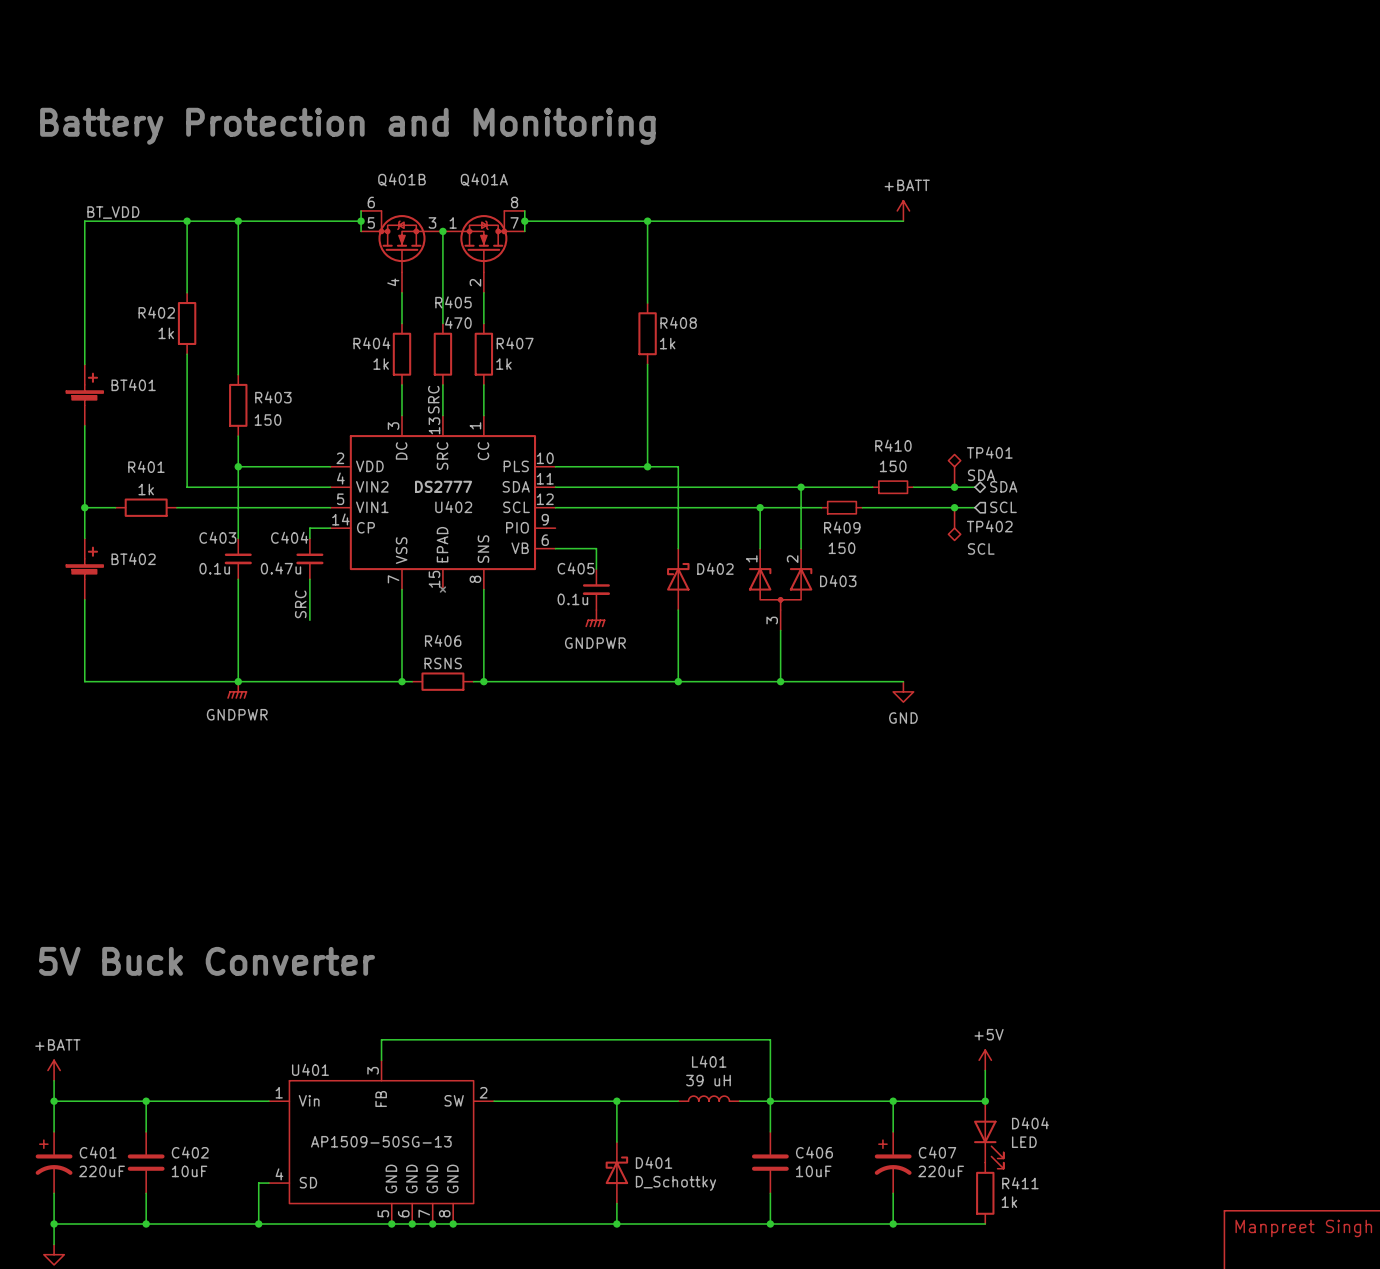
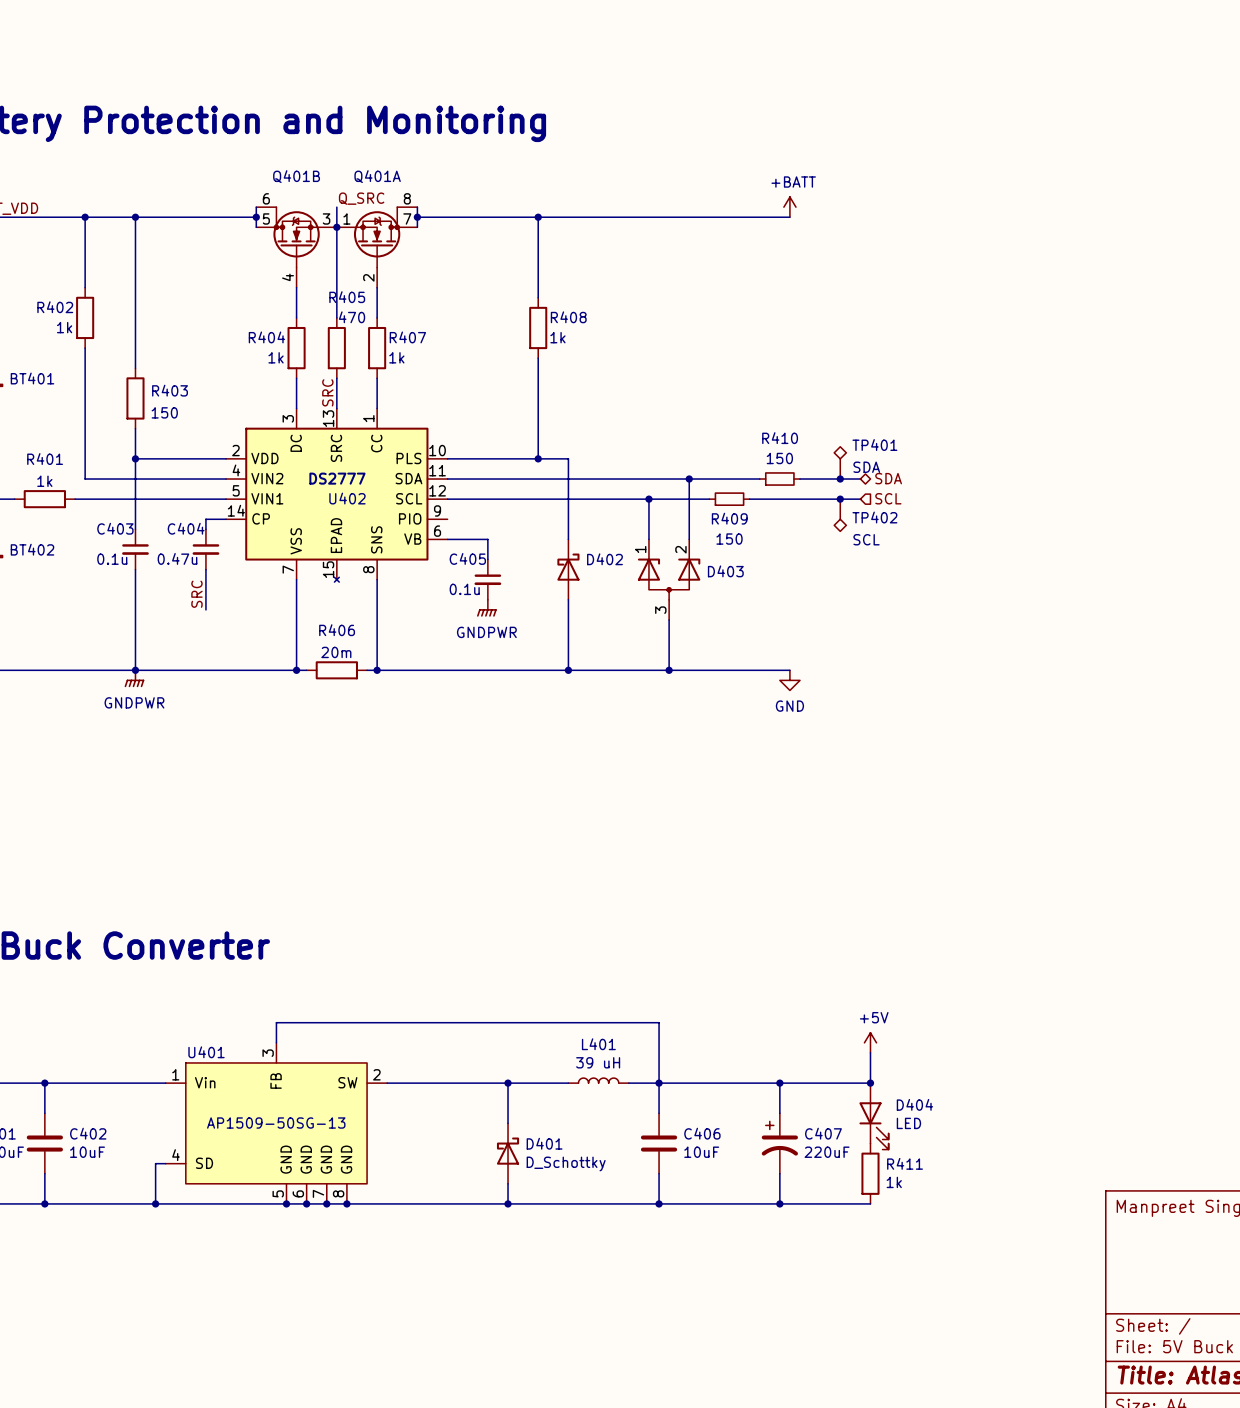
label: none -> Q_SRC (361, 198)
wire: none -> (336, 207) (336, 227)
R406 value: RSNS (443, 663) -> 20m (336, 652)

